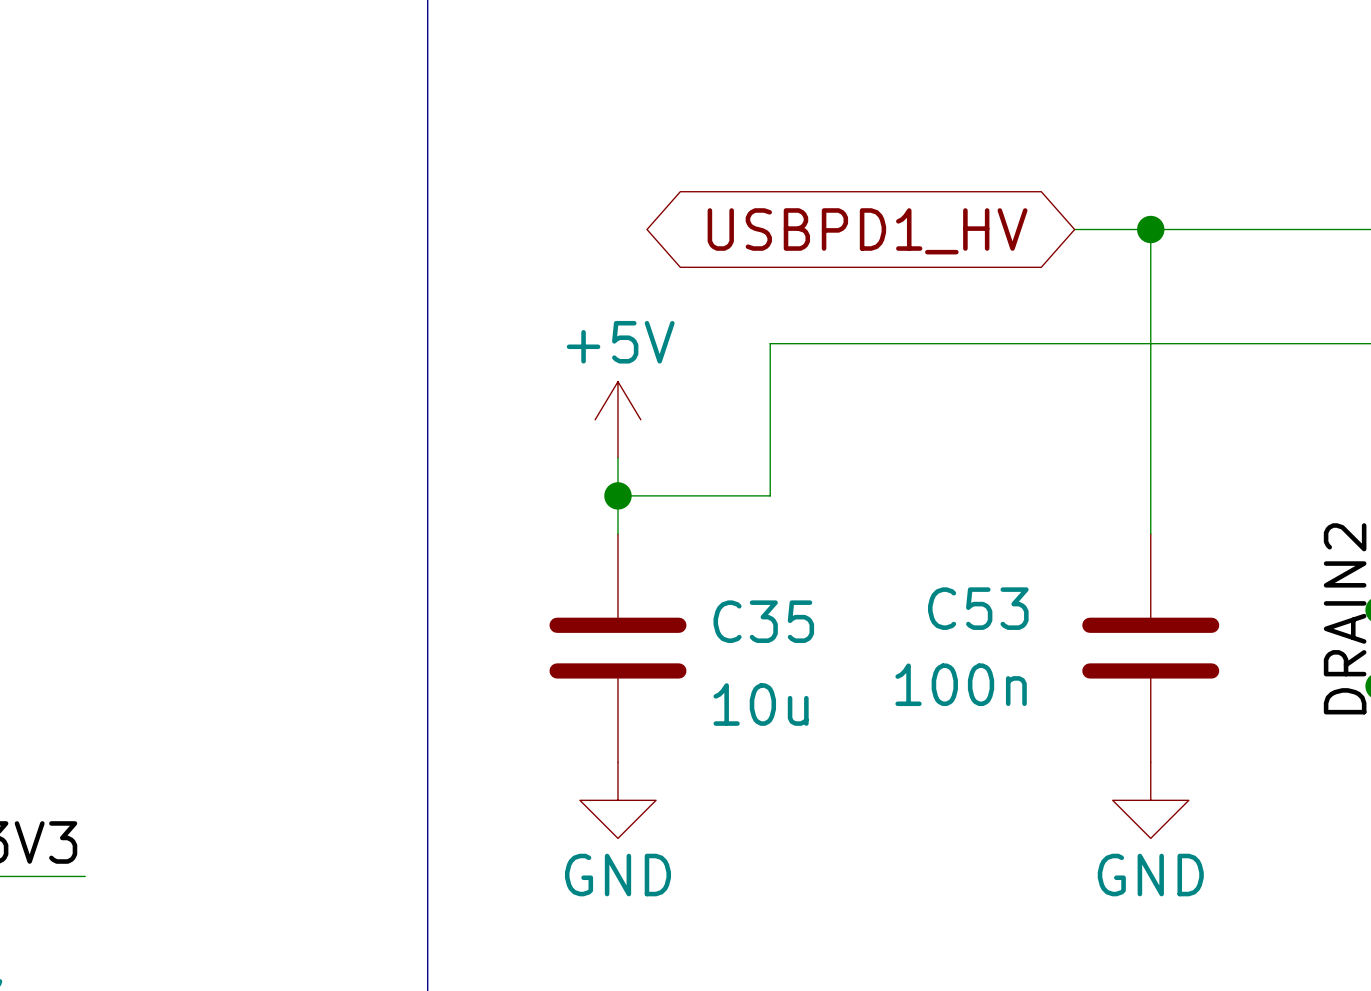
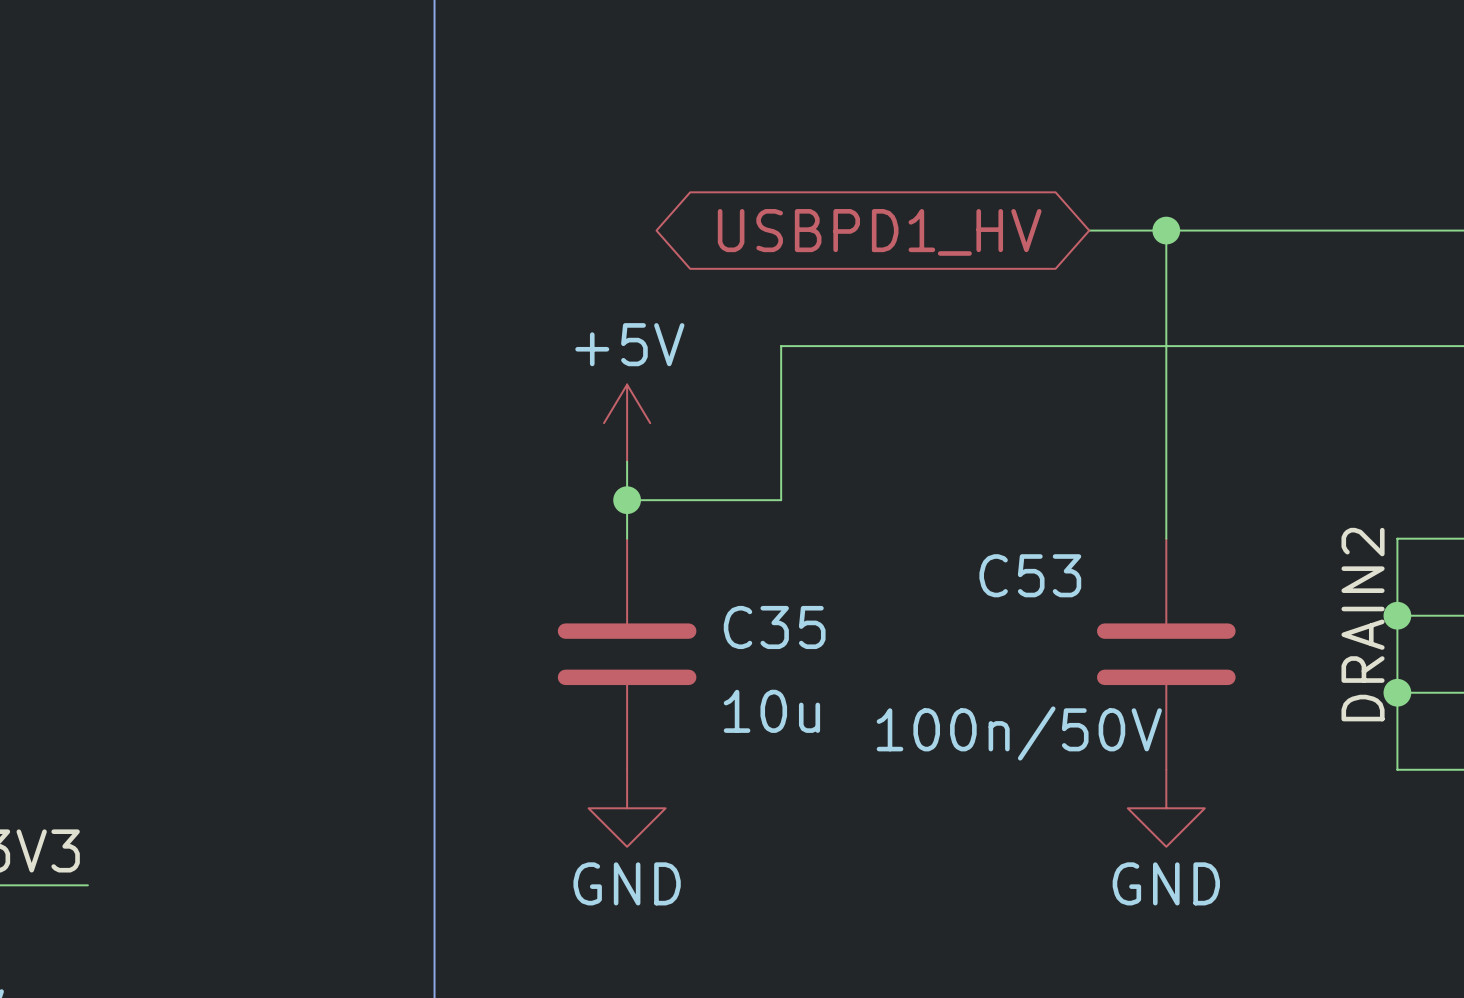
C53 name position: C53 (978, 608) -> C53 (1030, 575)
C53 text: 100n (961, 684) -> 100n/50V (1019, 733)

